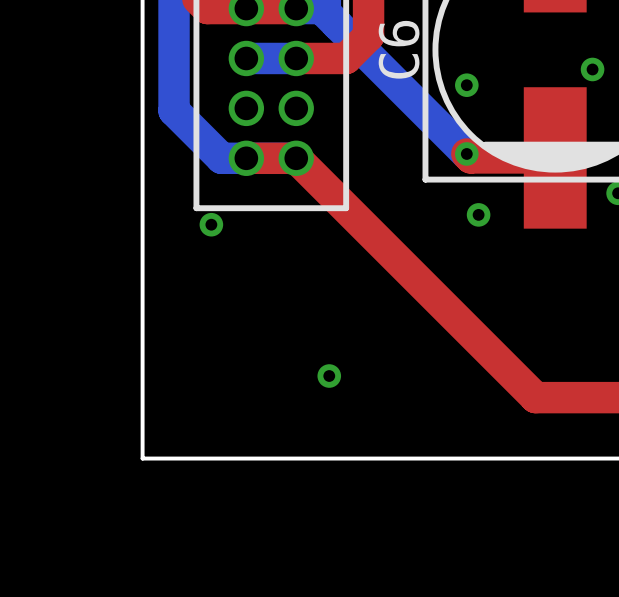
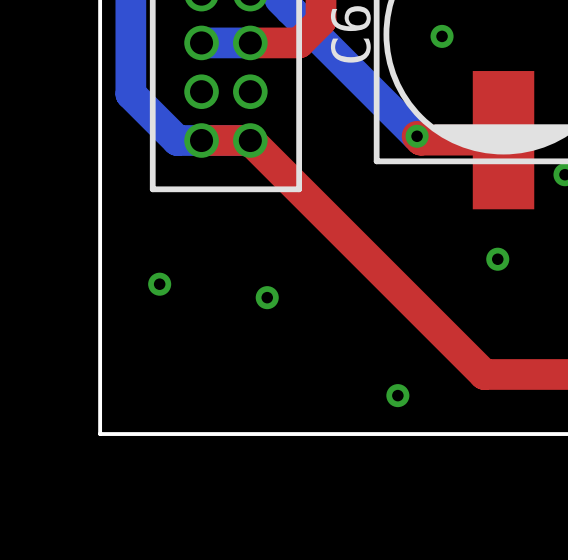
via: (592, 69) -> none
via position: (466, 85) -> (442, 36)
via: (478, 214) -> none
via: (211, 224) -> none
via: none -> (497, 259)
via: none -> (159, 284)
via position: (329, 376) -> (267, 297)
via: none -> (397, 395)

